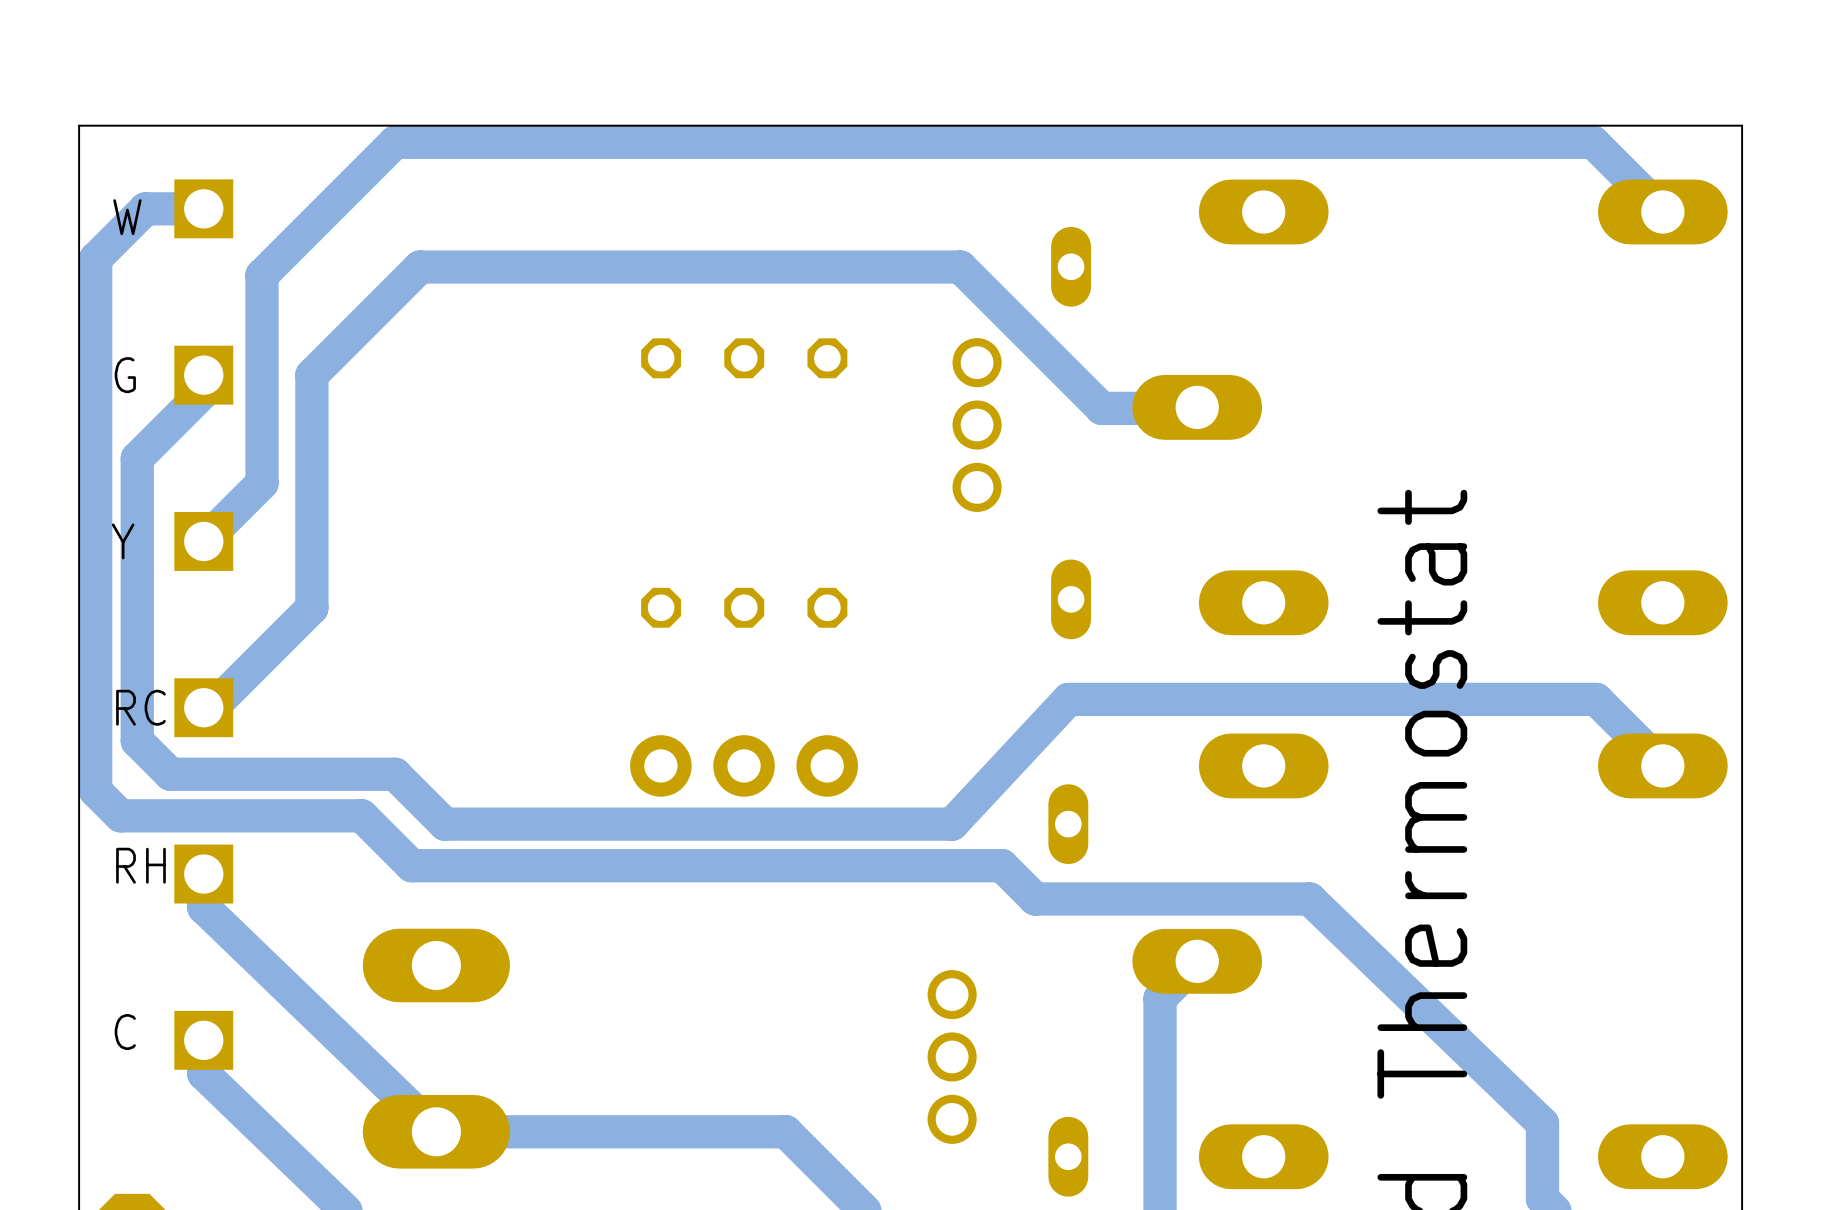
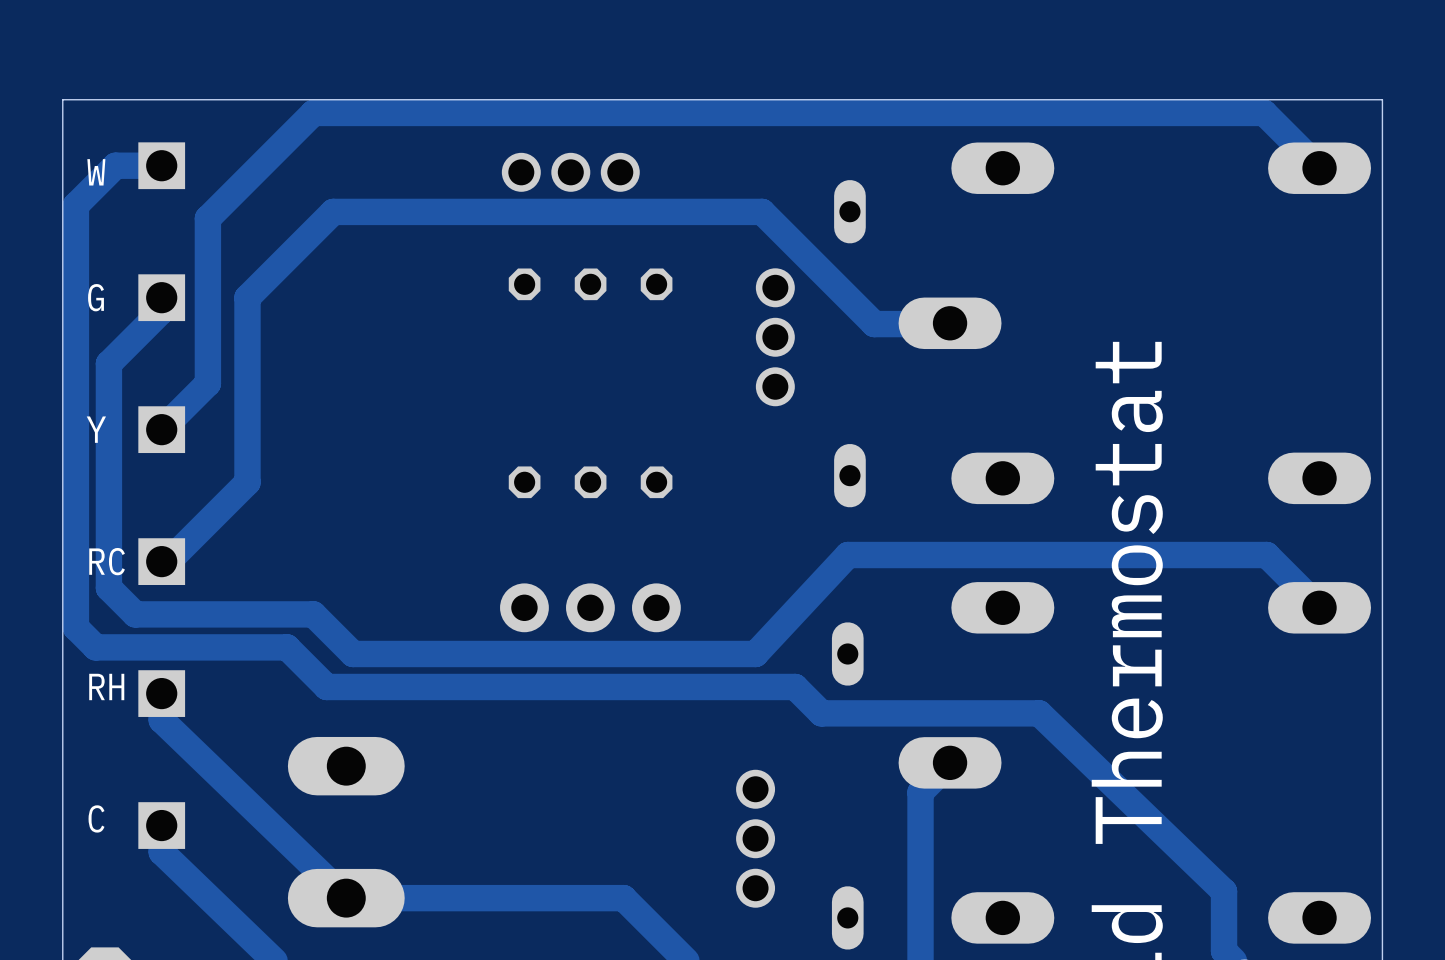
part: none -> (570, 172)

